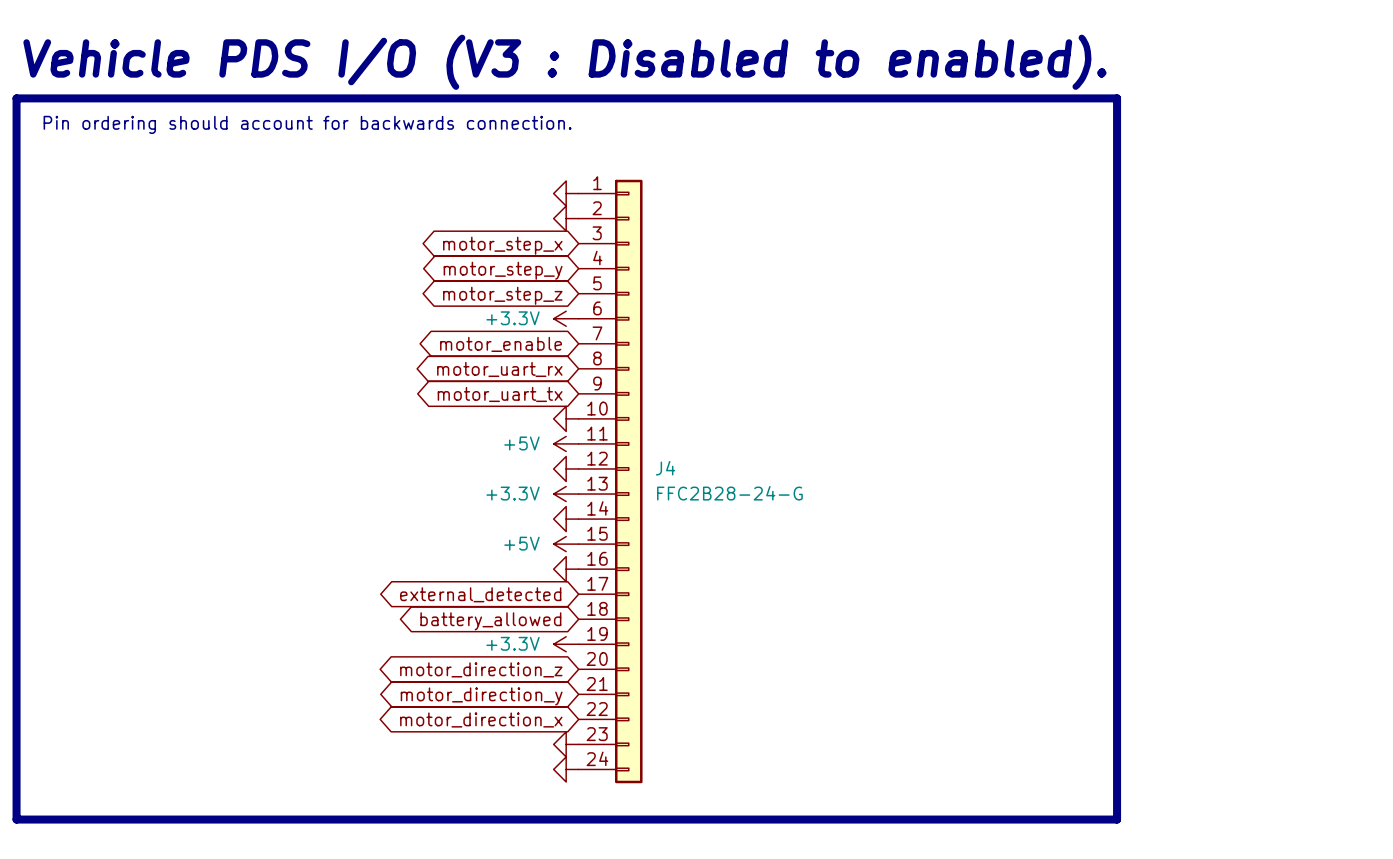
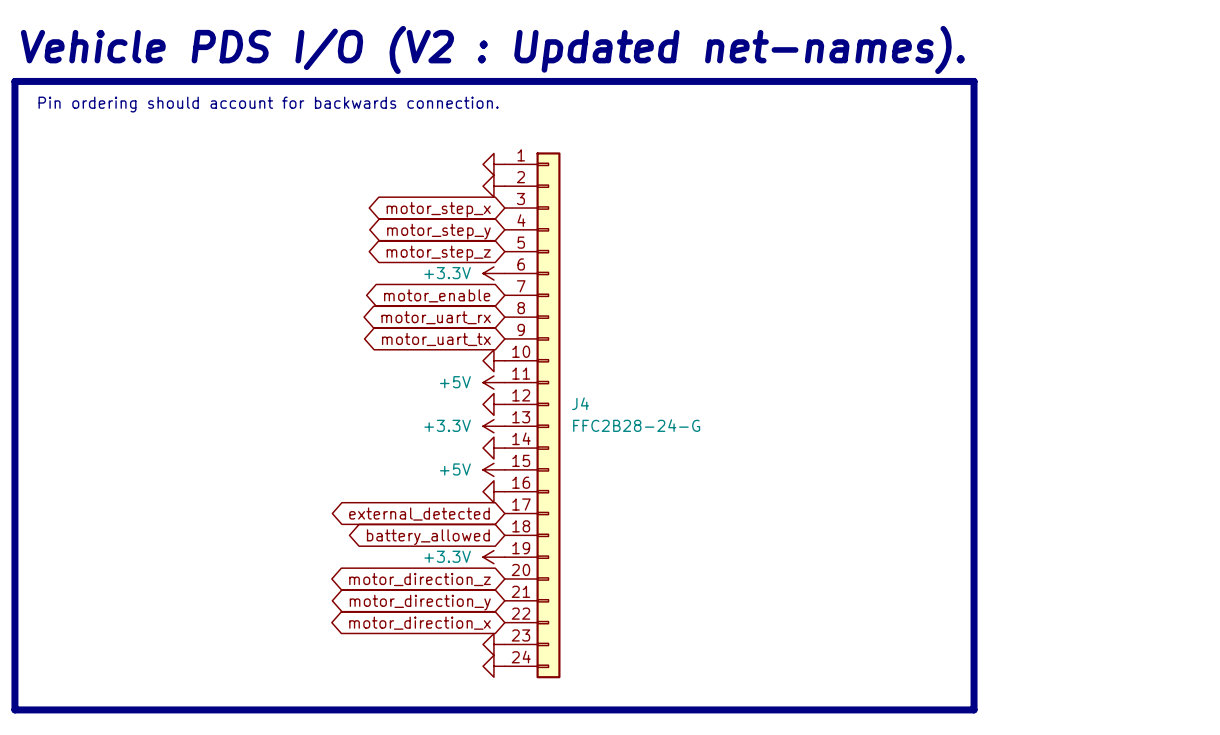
text: Vehicle PDS I/O (V3 : Disabled to enabled). (564, 62) -> Vehicle PDS I/O (V2 : Updated net-names). (492, 49)

